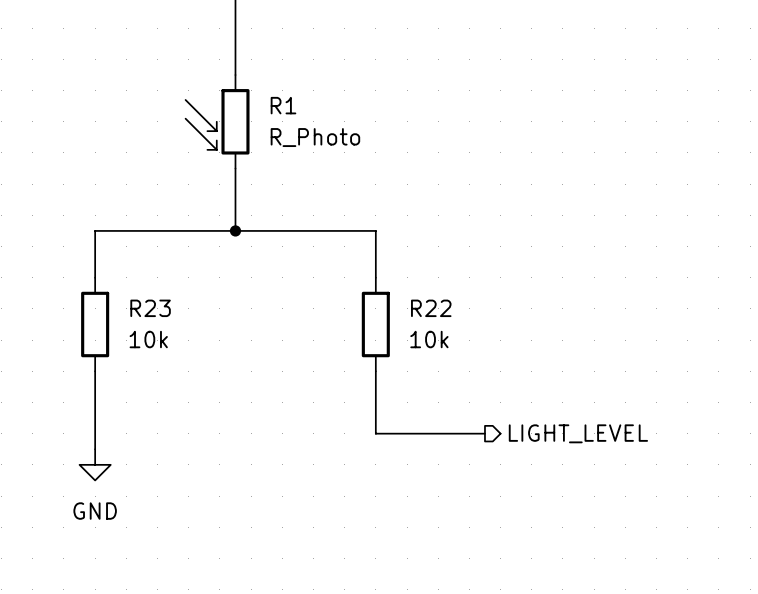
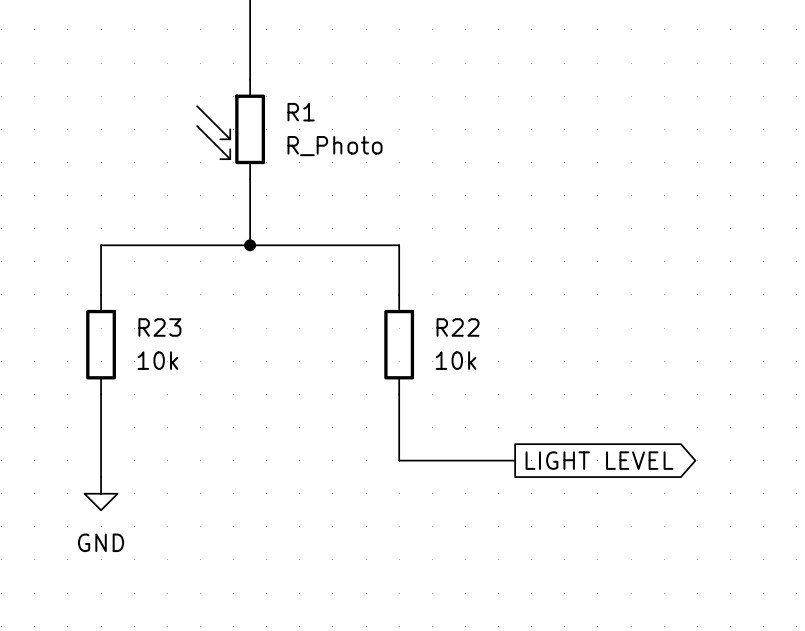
global label: none -> LIGHT LEVEL (599, 460)
hierarchical label: LIGHT_LEVEL (578, 433) -> none

